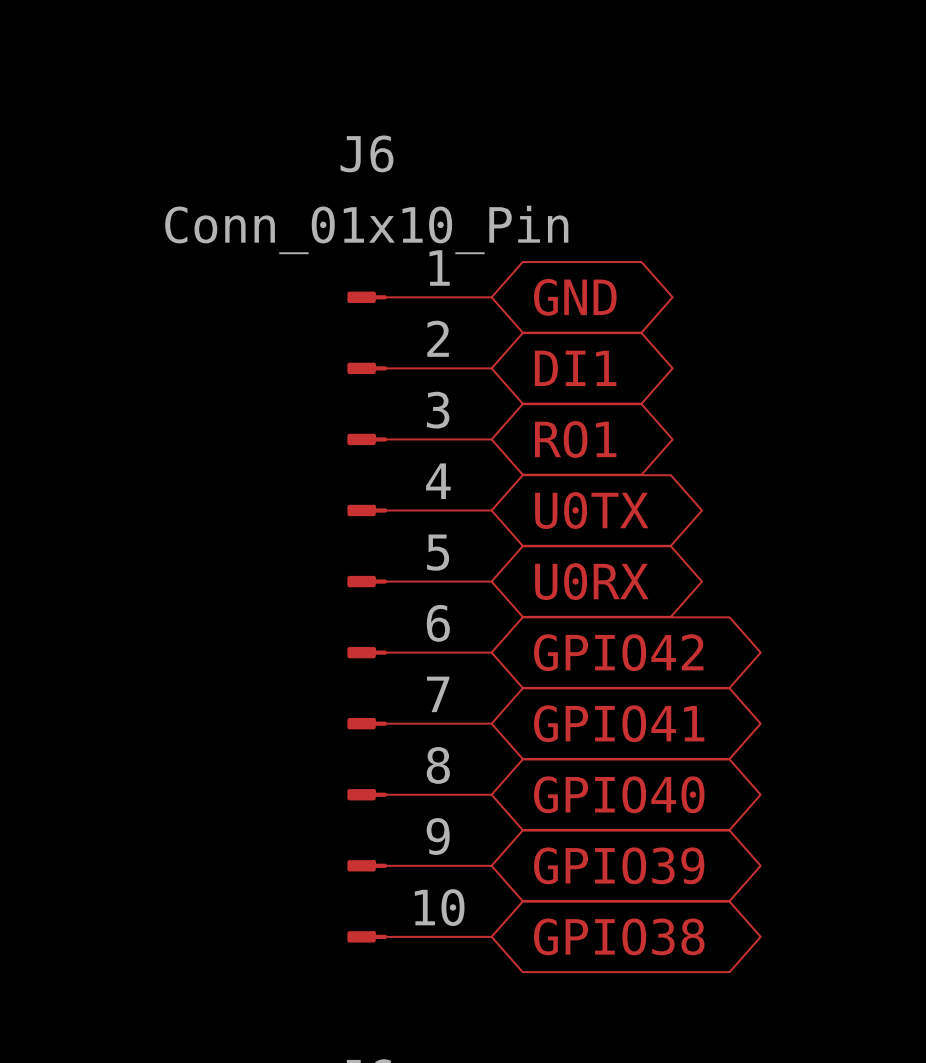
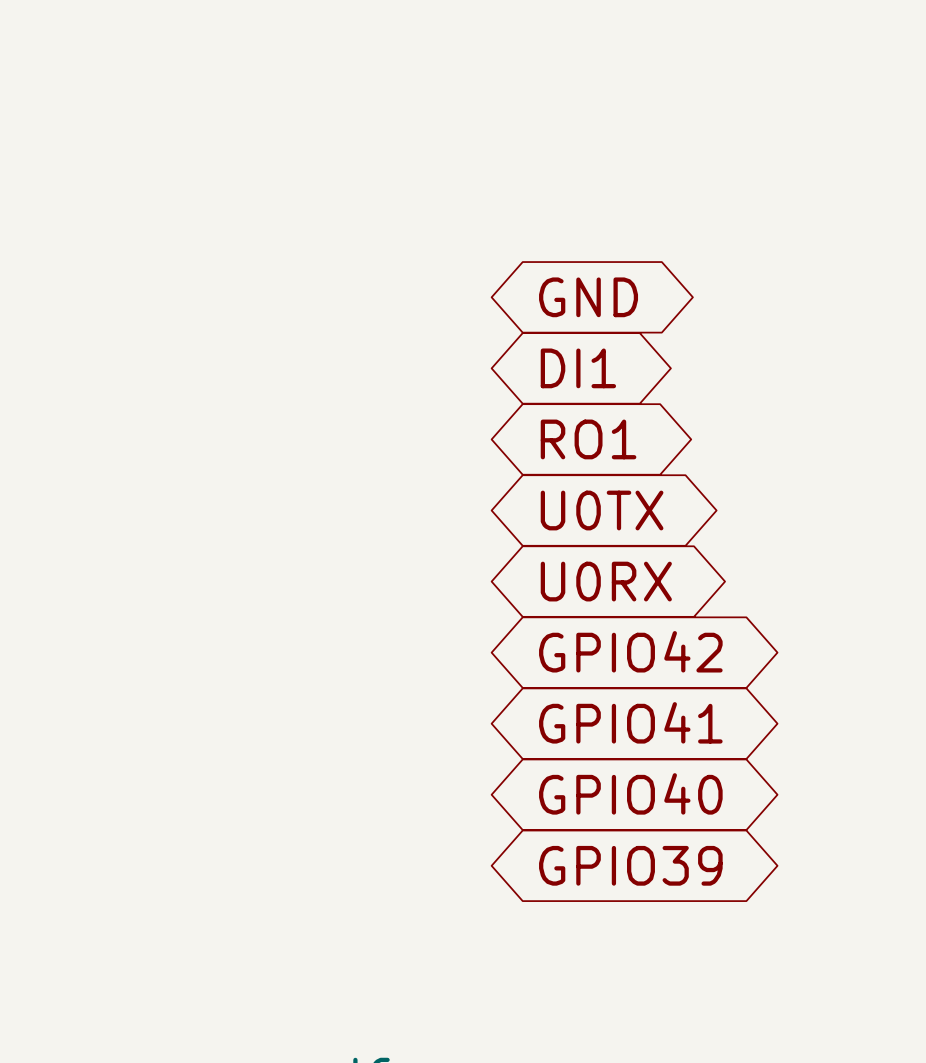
J6: Conn_01x10_Pin (419, 617) -> none
global label: GPIO38 (619, 936) -> none

